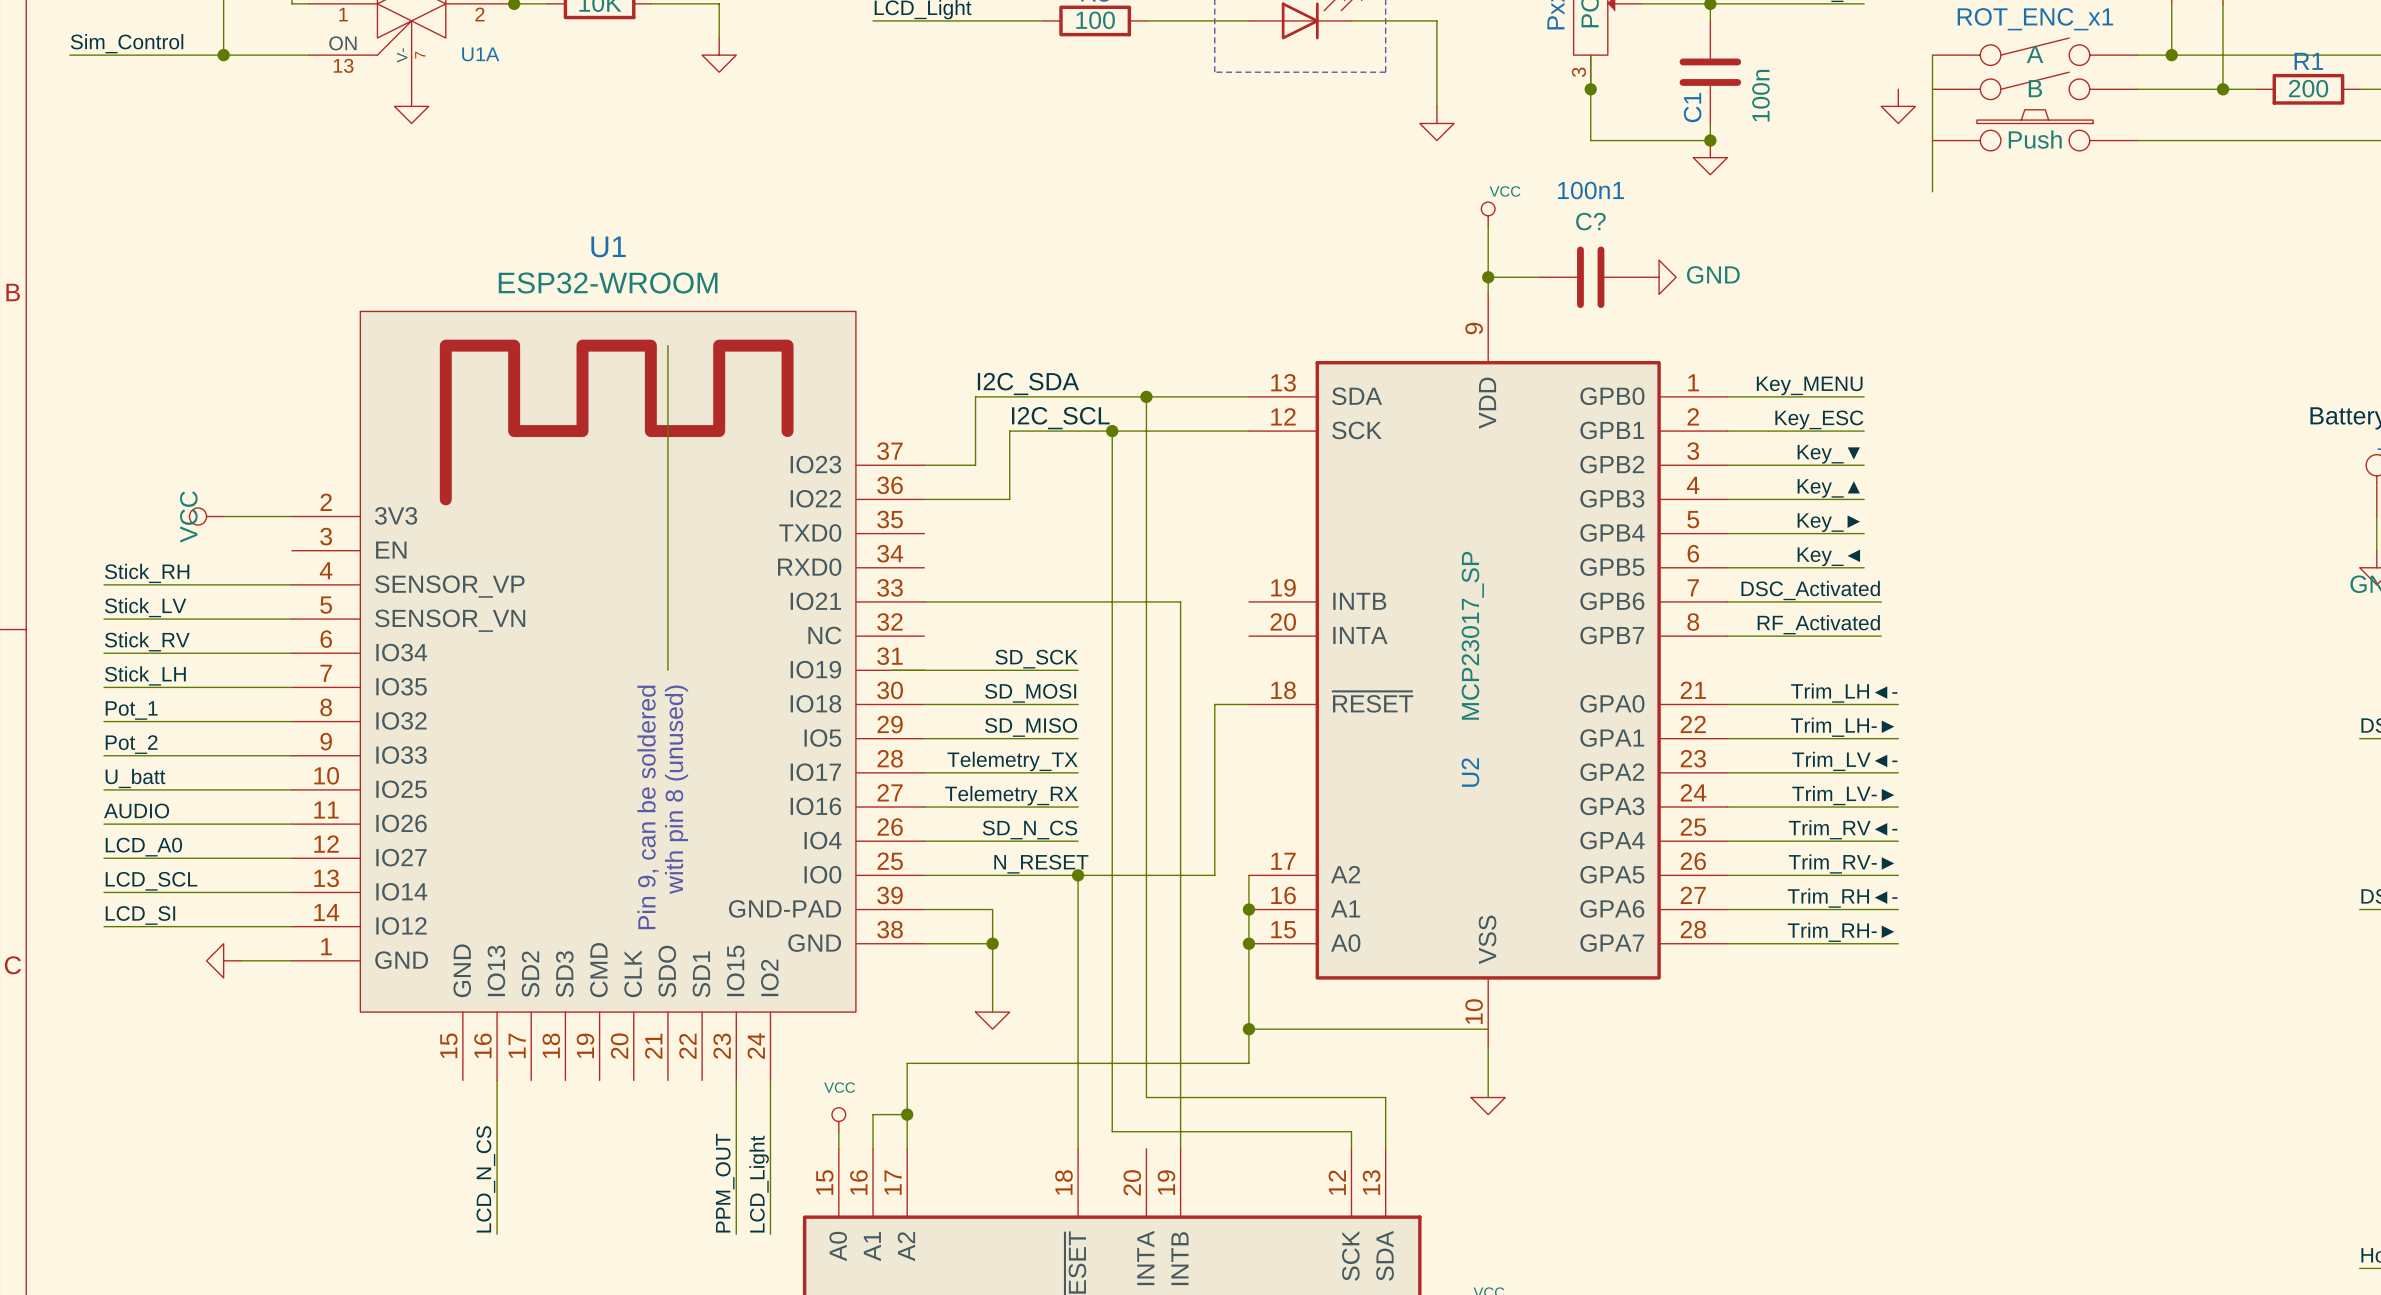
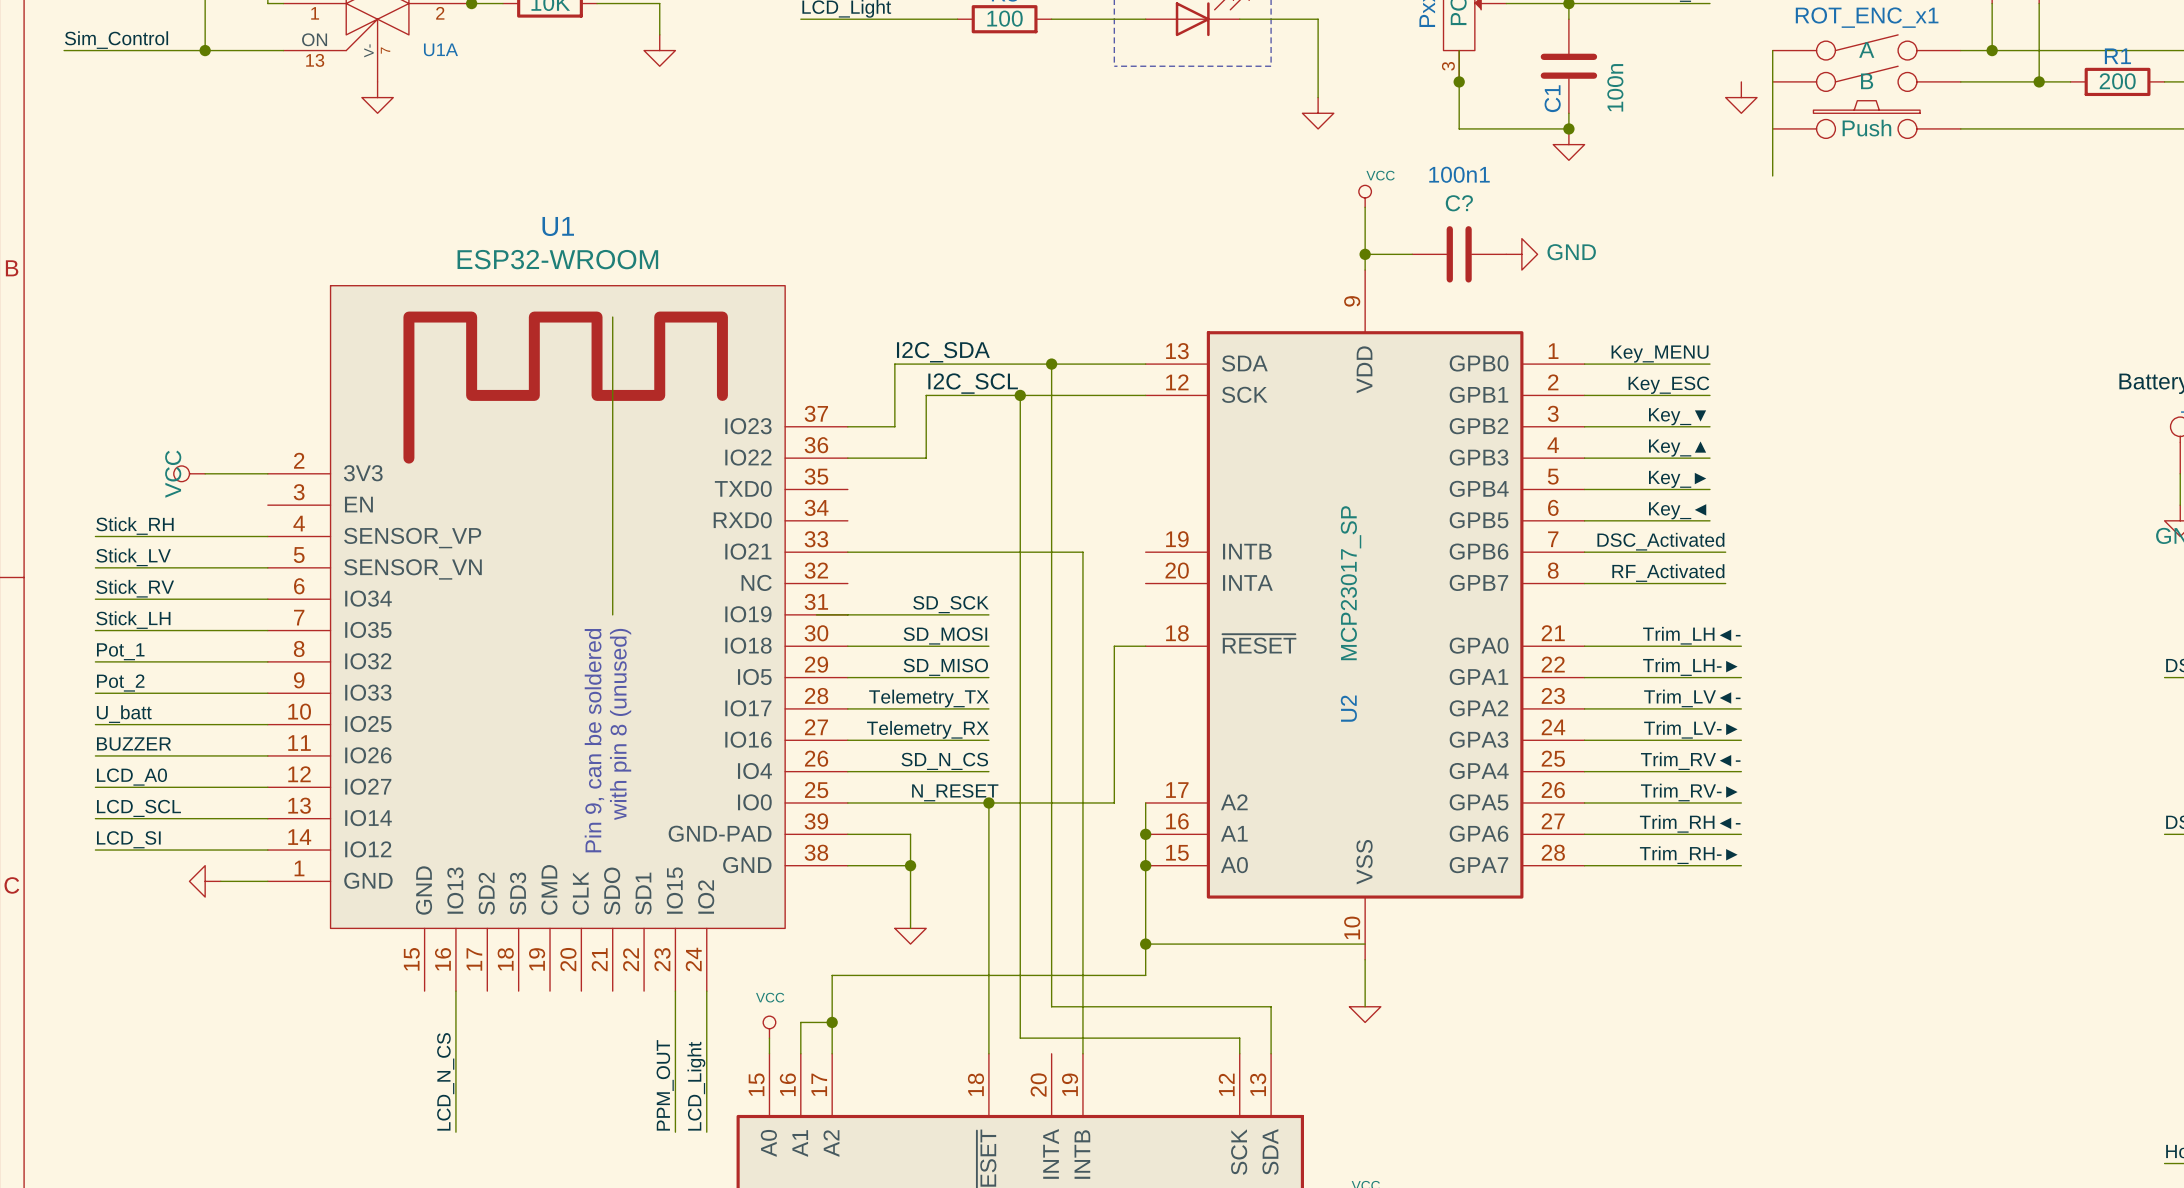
label: AUDIO (136, 810) -> BUZZER (134, 744)

